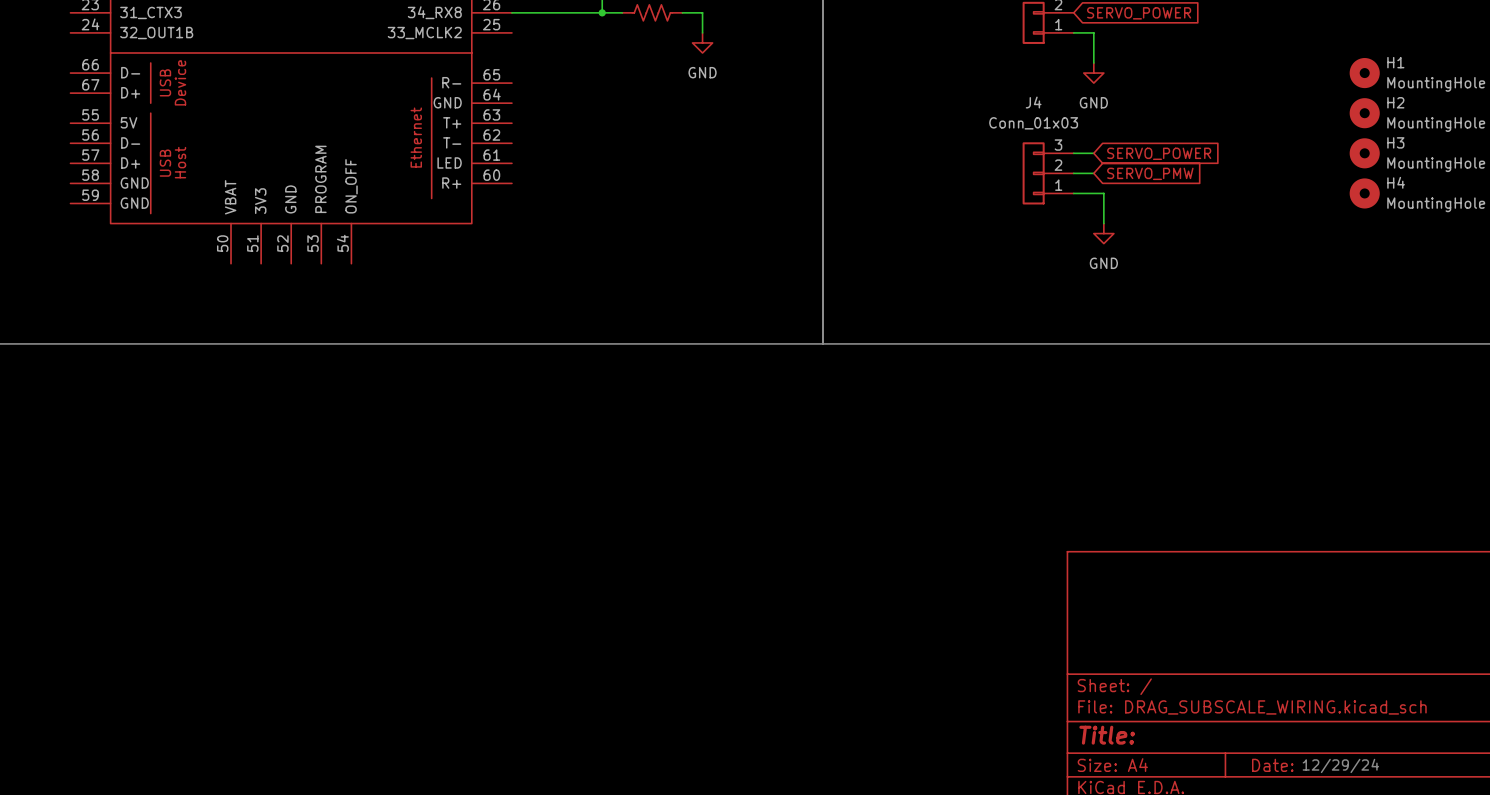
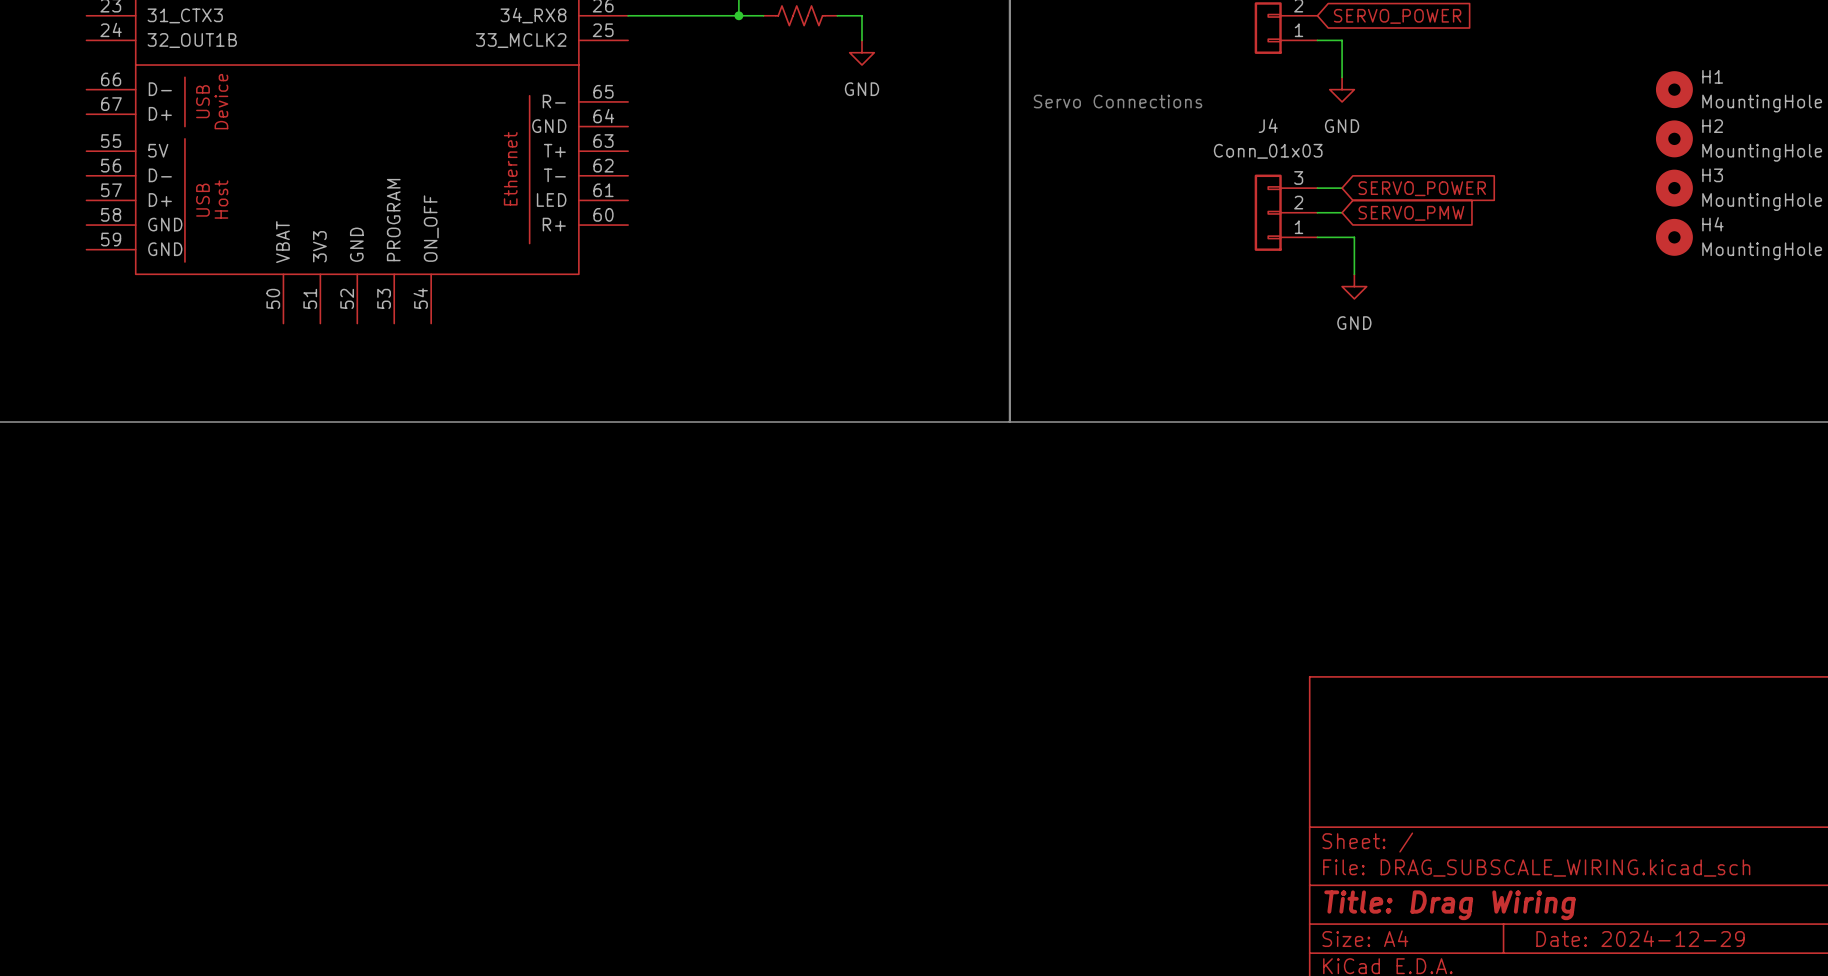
text: none -> Servo Connections (1118, 101)
title block: Title: (1107, 735) -> Title: Drag Wiring (1449, 905)
title block: Date: (1272, 765) -> Date: 2024-12-29 (1640, 938)
text: 12/29/24 (1340, 765) -> none

